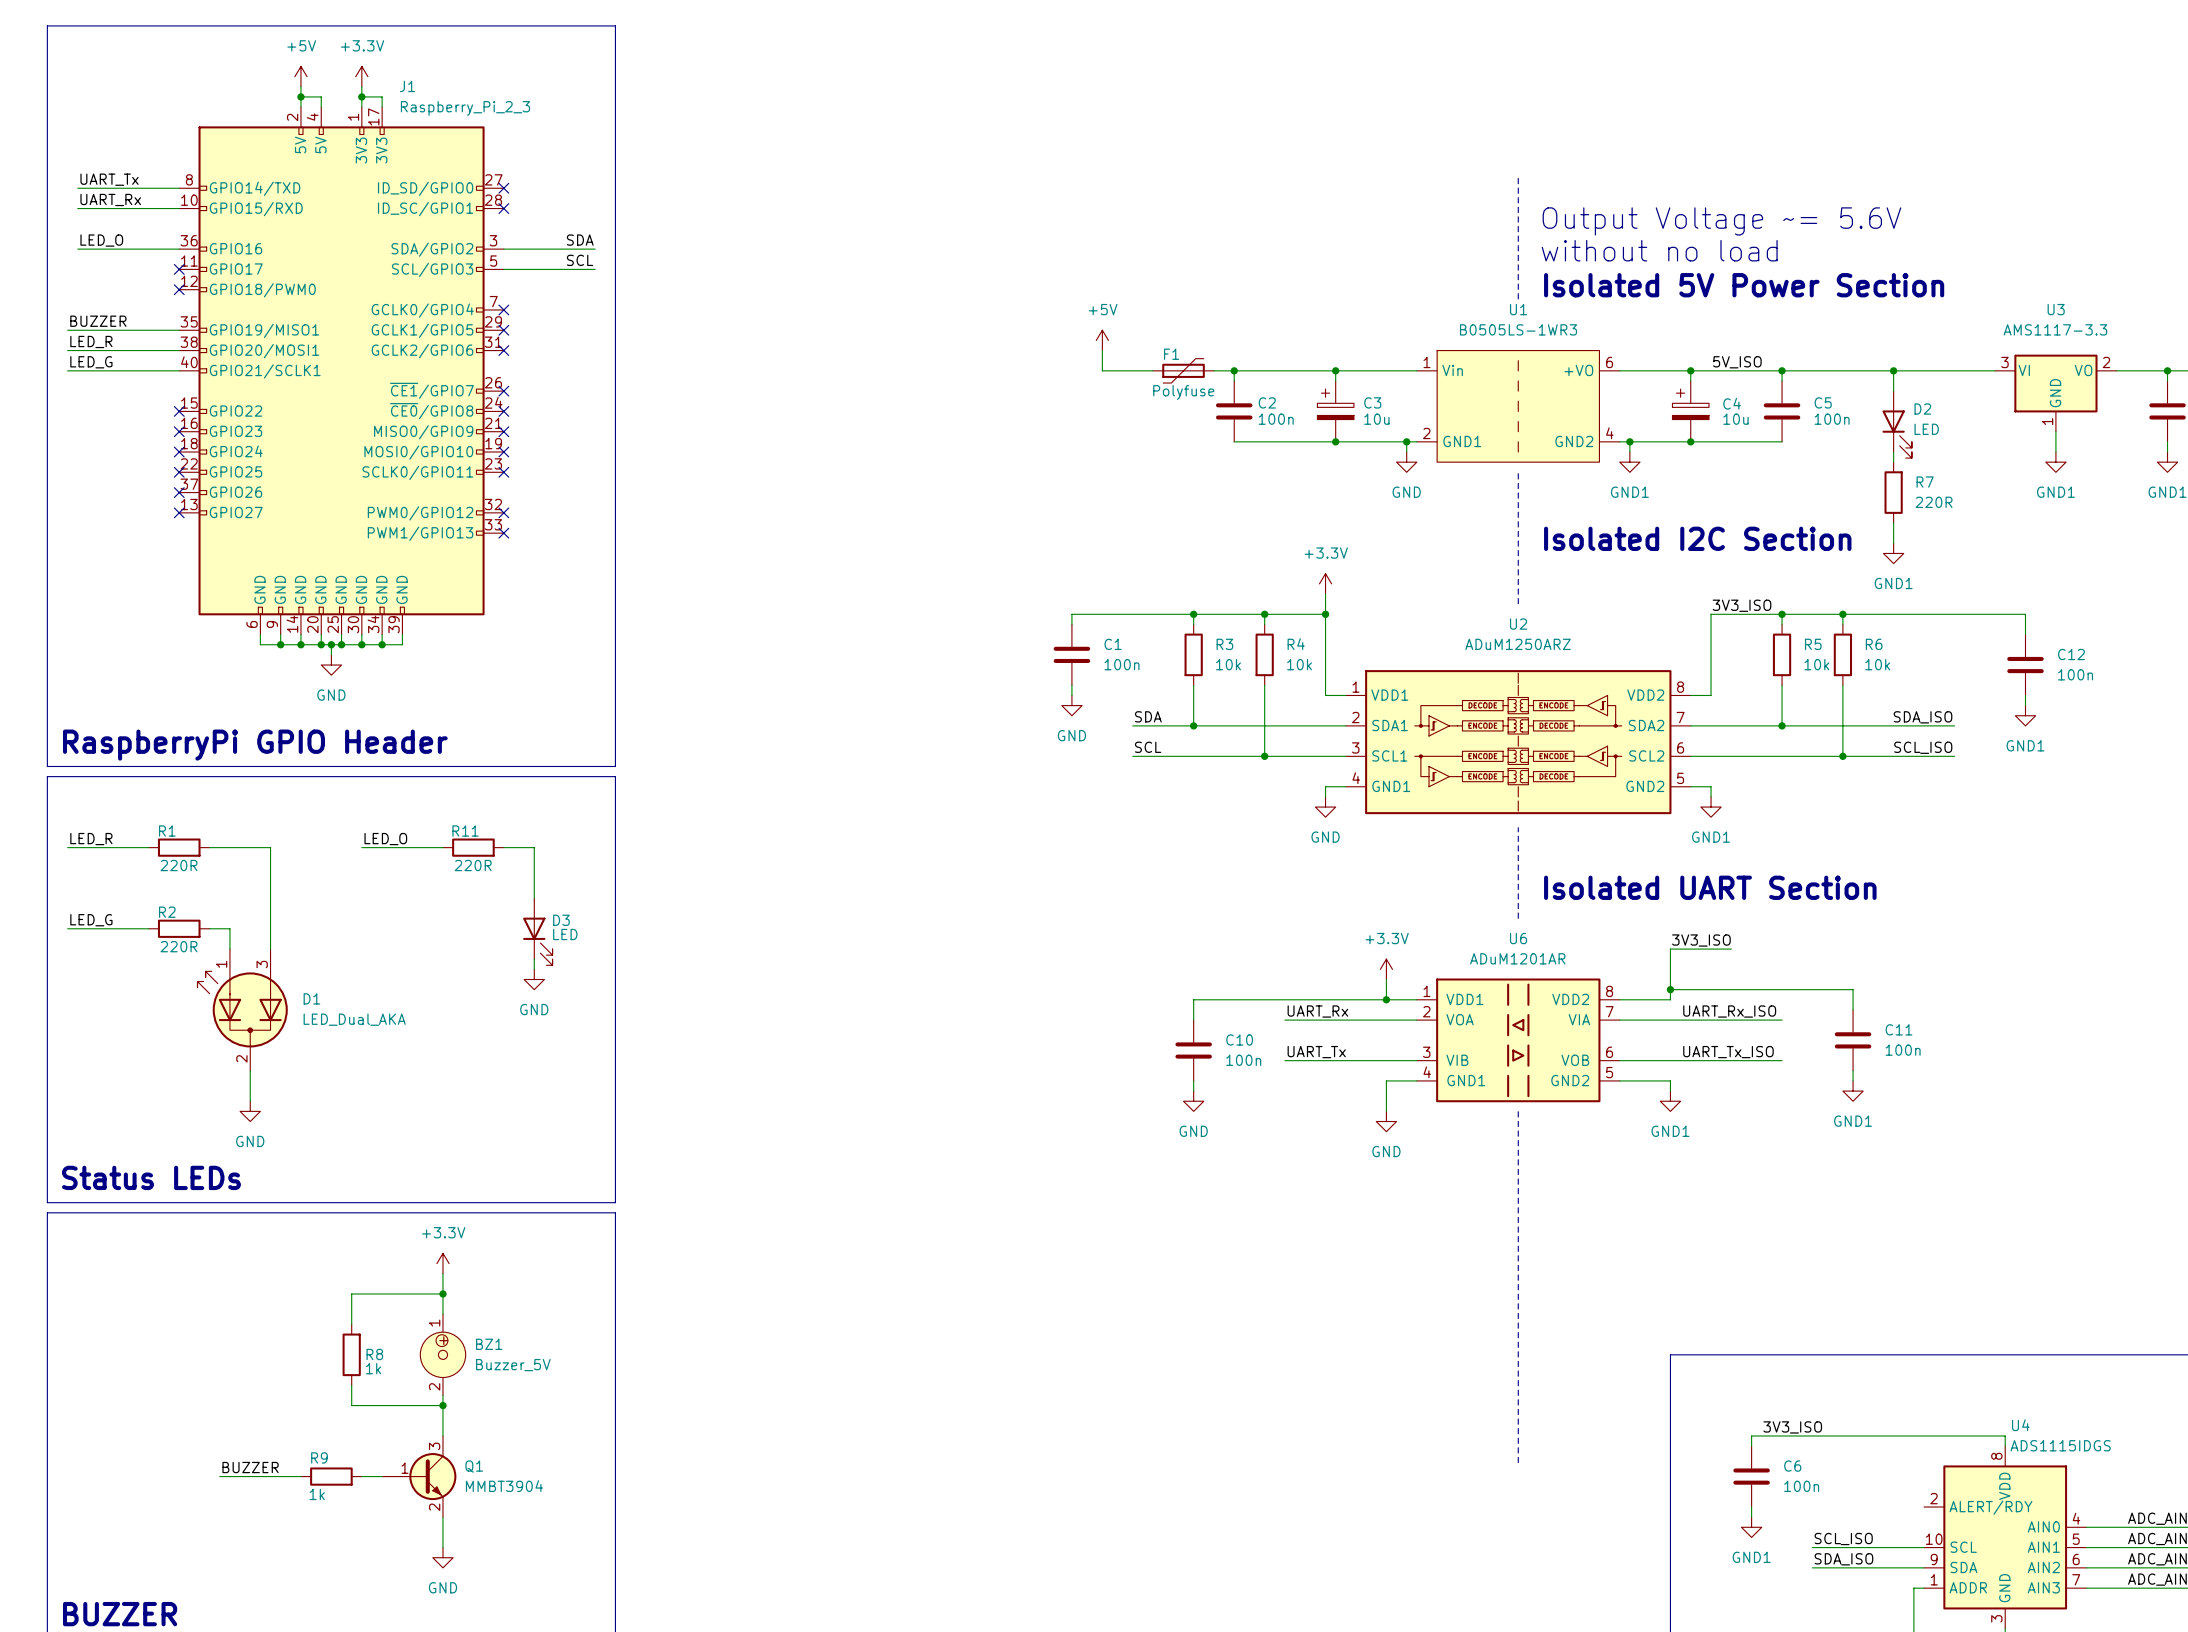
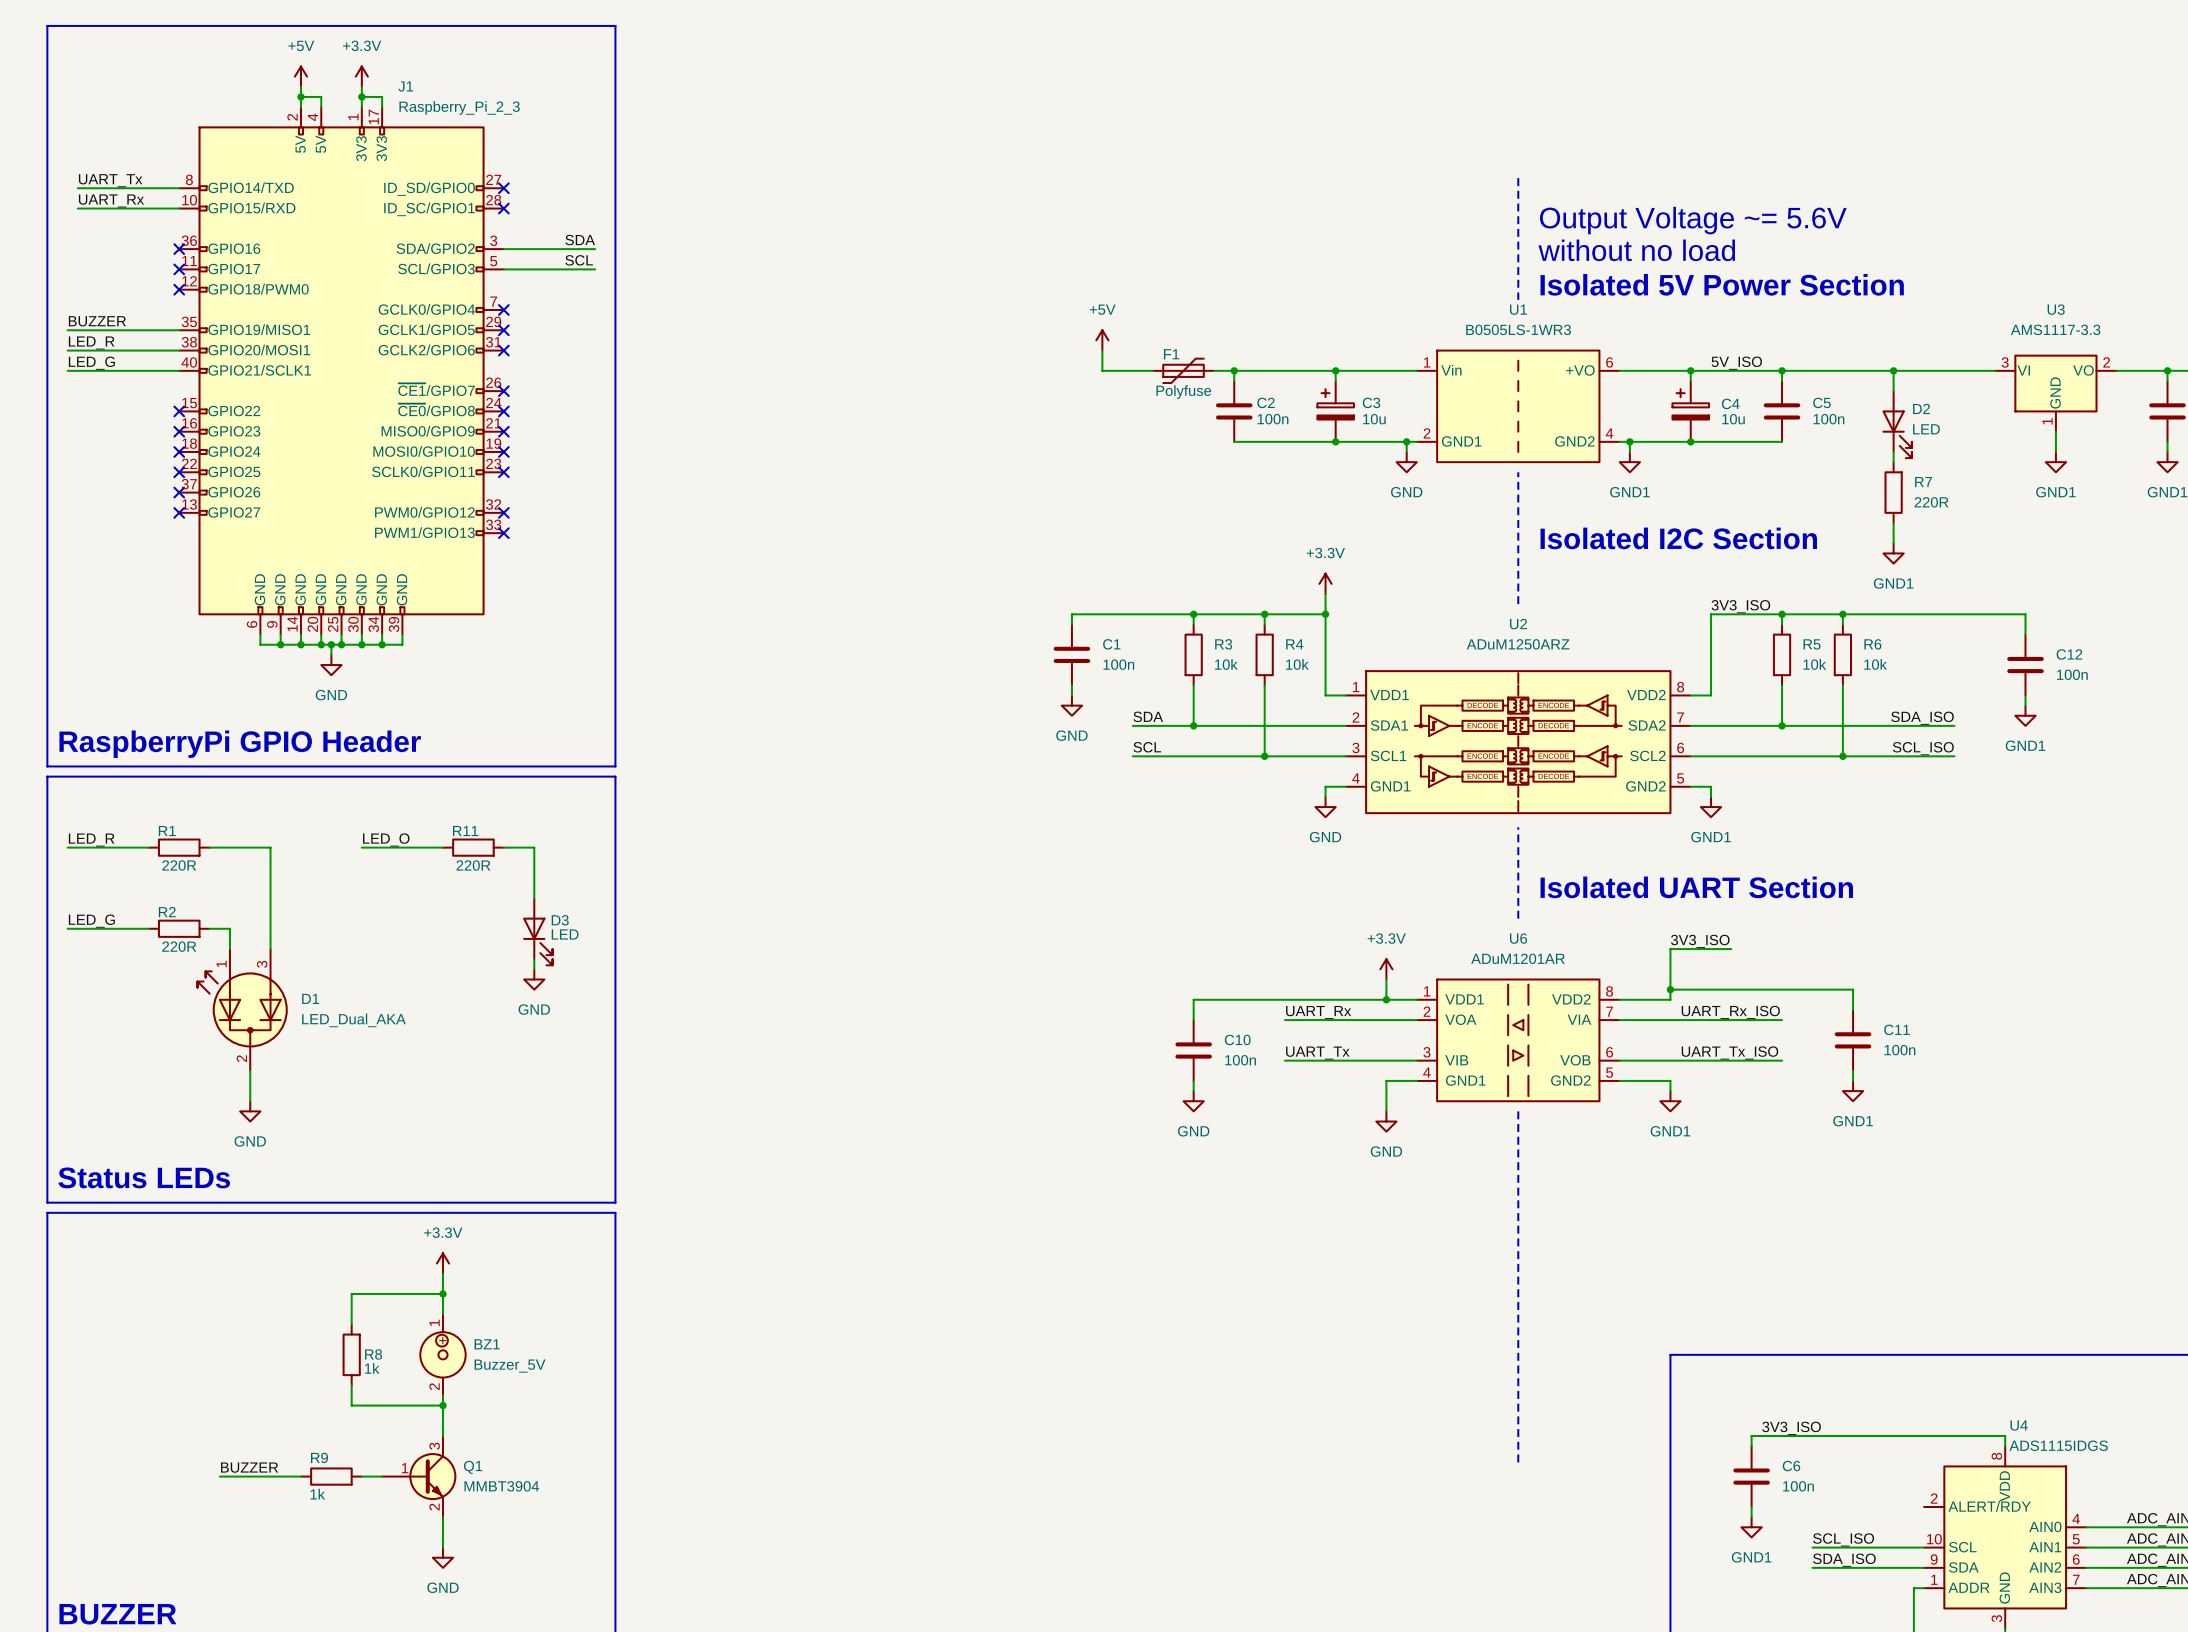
label: LED_O (101, 240) -> none
wire: (77, 249) (179, 249) -> none
no-connect mark: none -> (179, 249)

